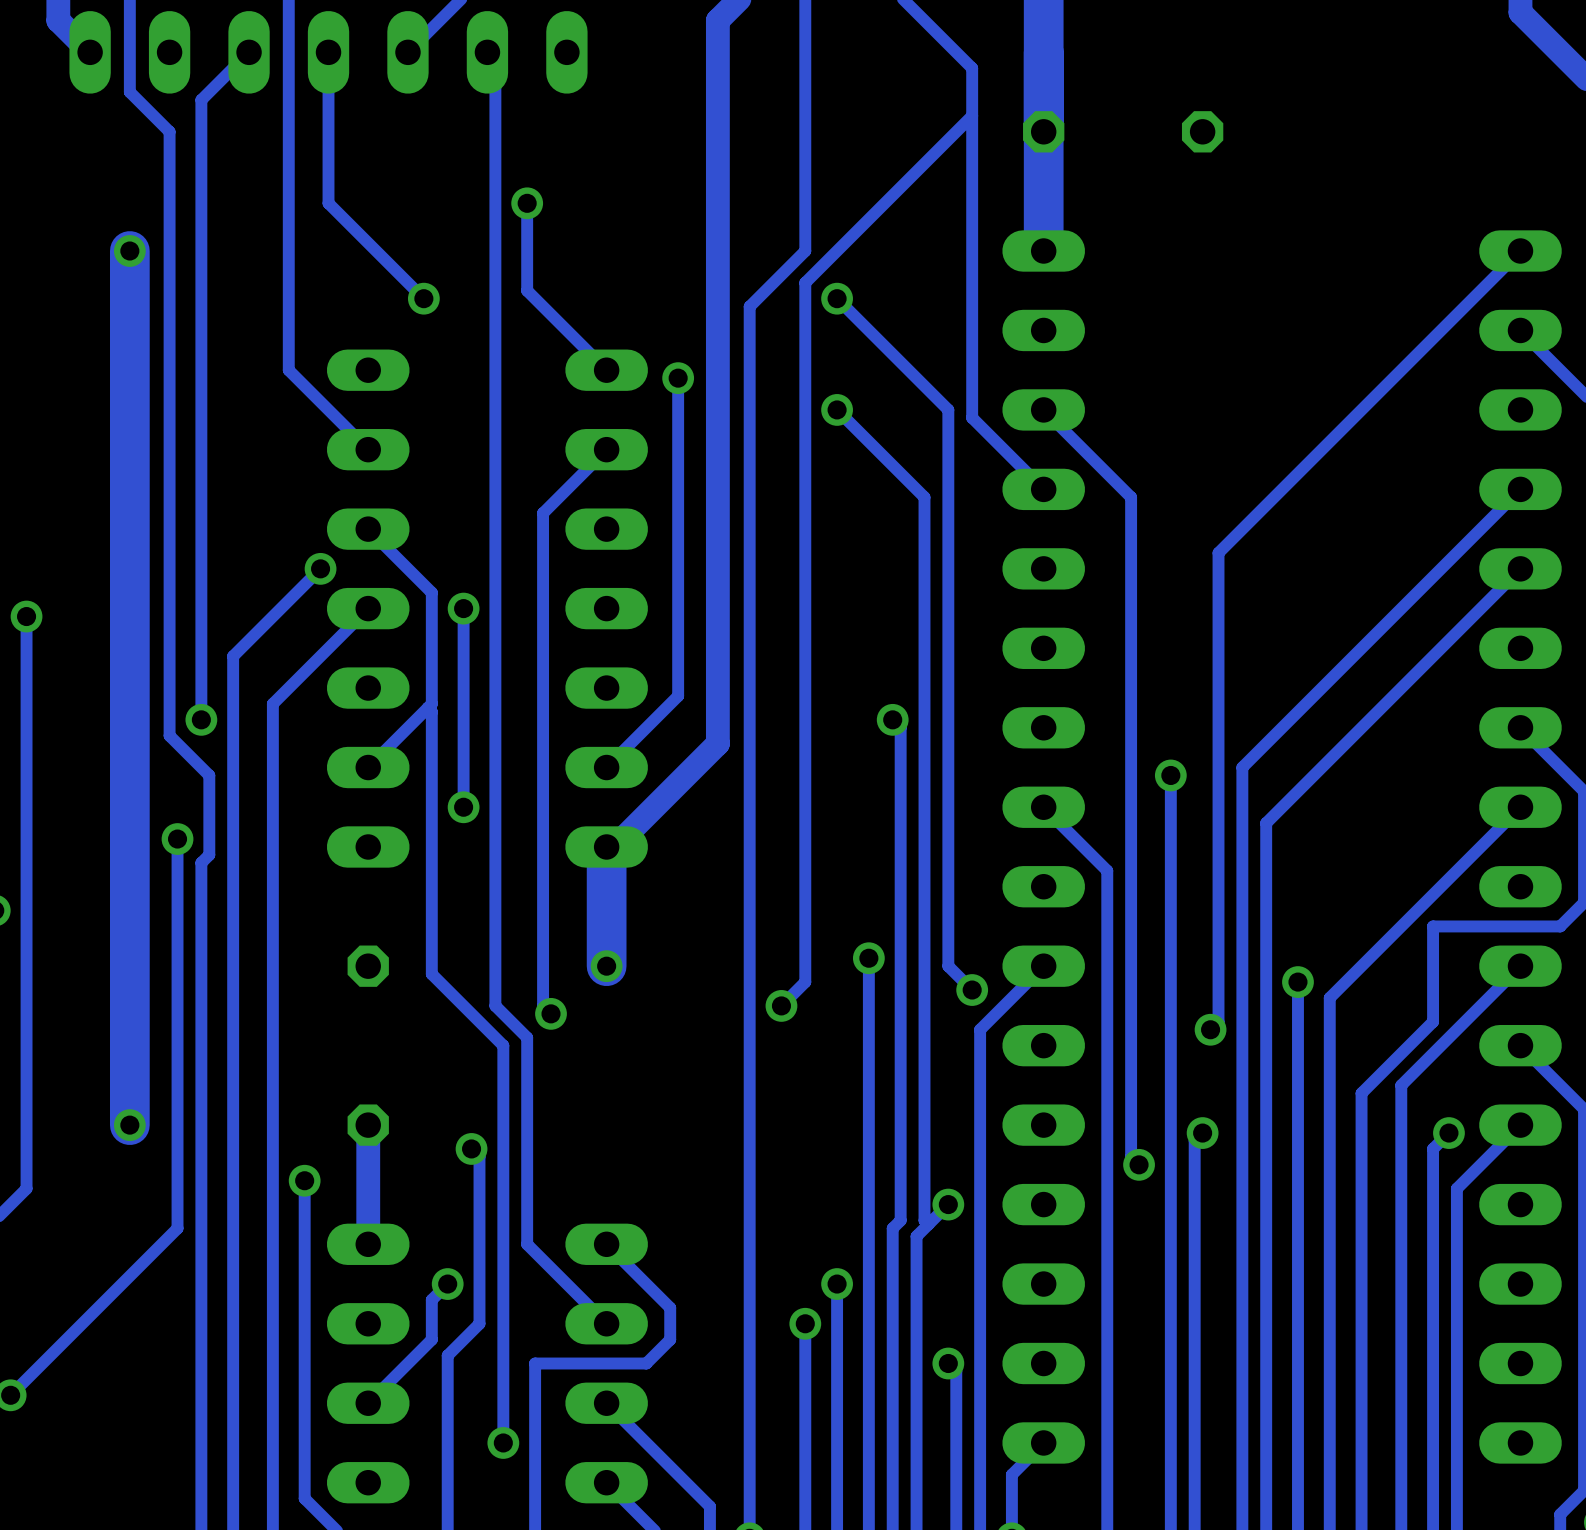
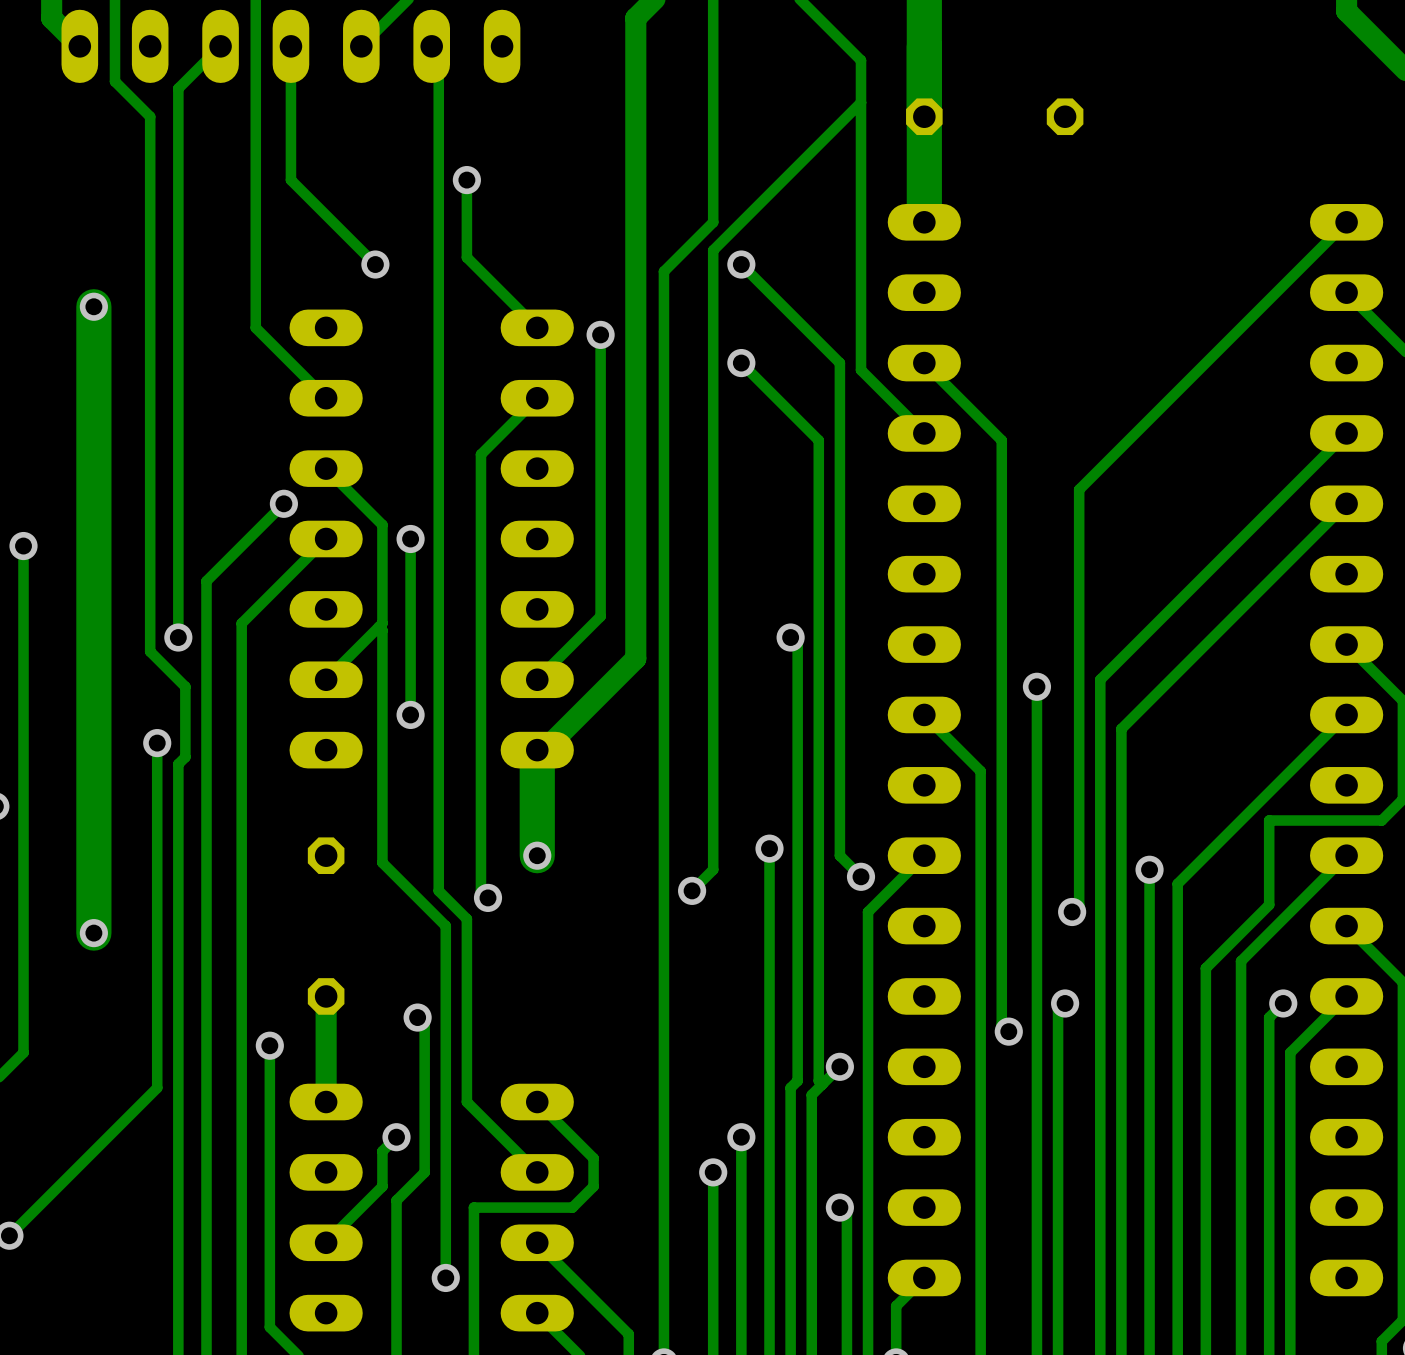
track: (129, 251) (129, 1125) -> none
via position: (129, 251) -> (93, 306)
track: none -> (93, 306) (93, 933)
via position: (129, 1125) -> (93, 933)

